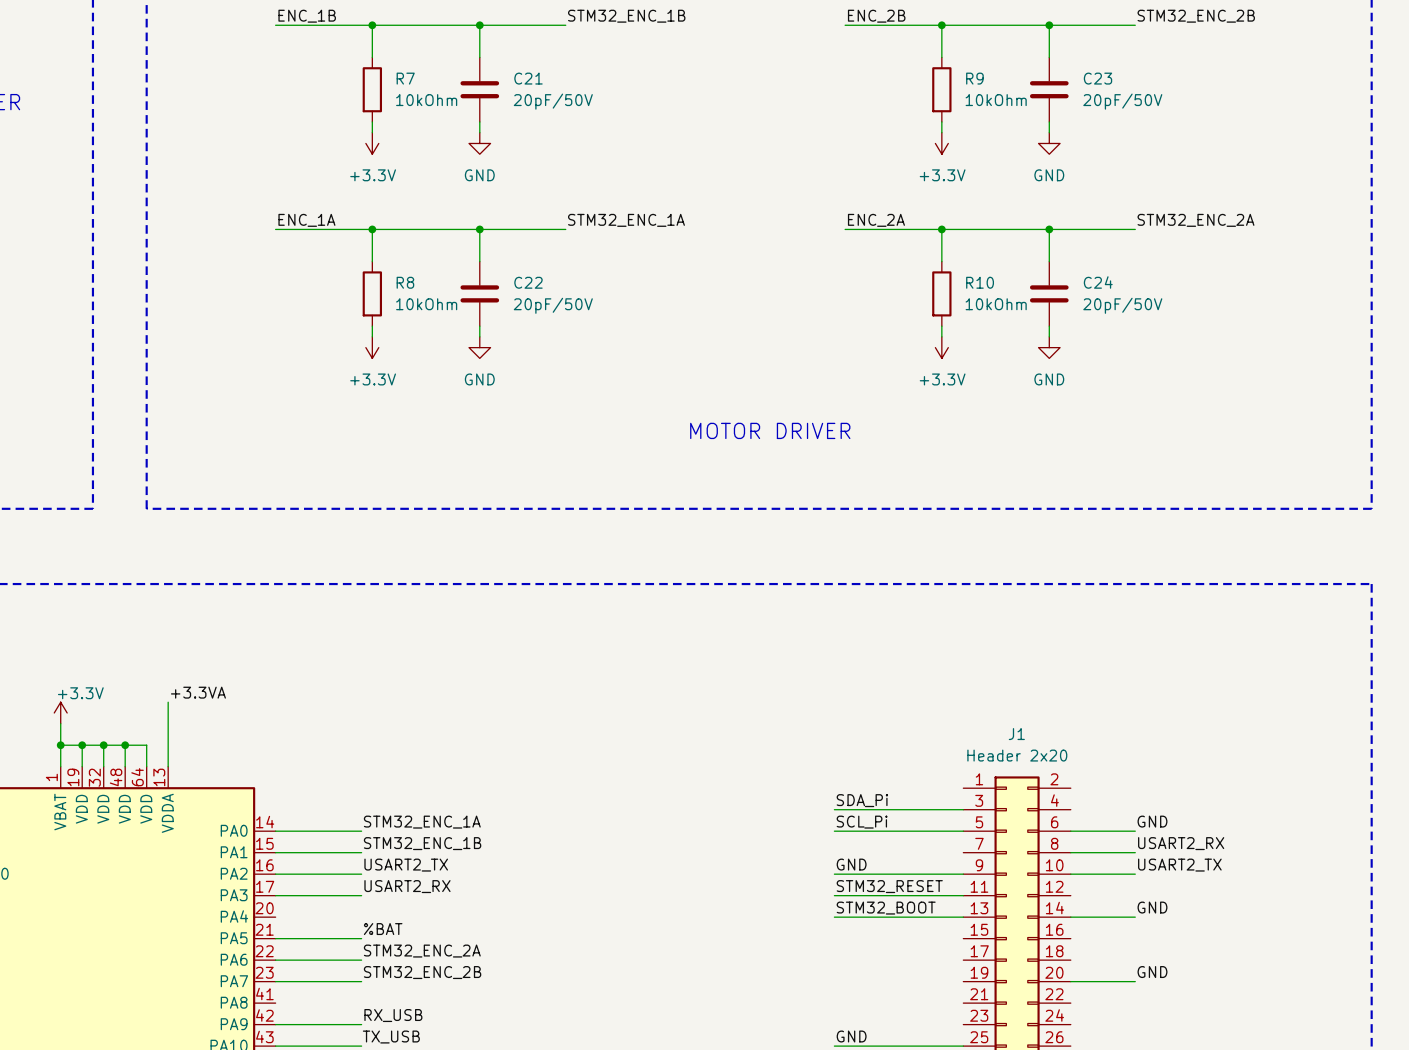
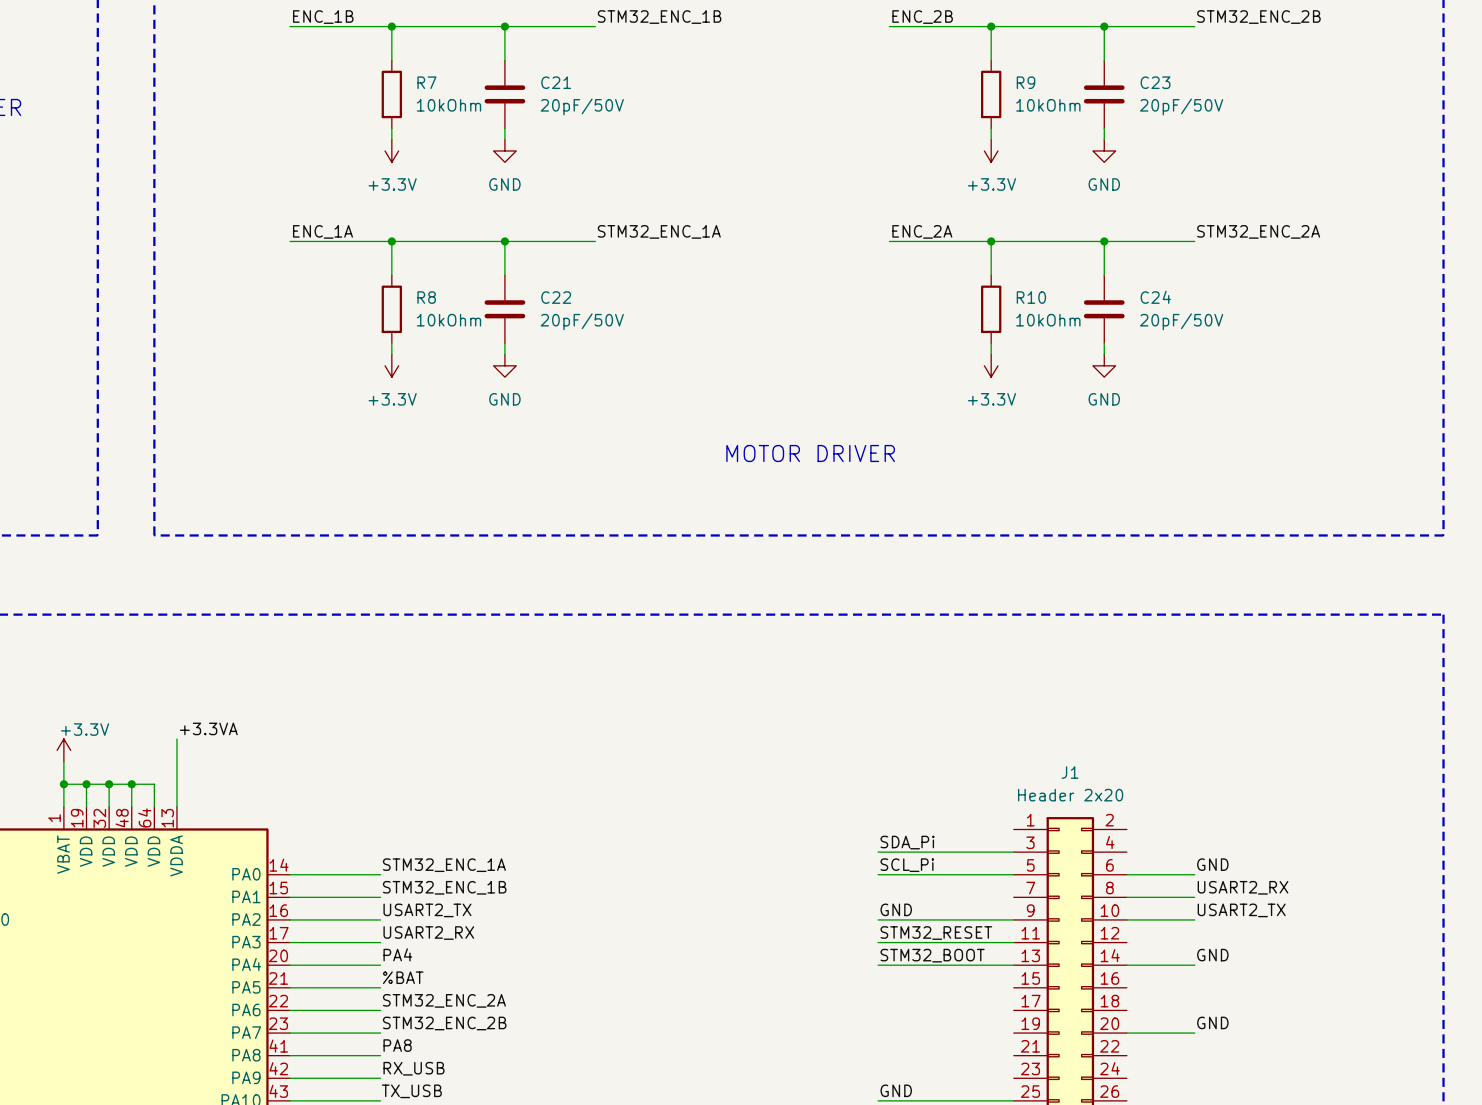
label: none -> PA4 (397, 954)
wire: none -> (290, 965) (380, 965)
label: none -> PA8 (397, 1045)
wire: none -> (290, 1055) (380, 1055)

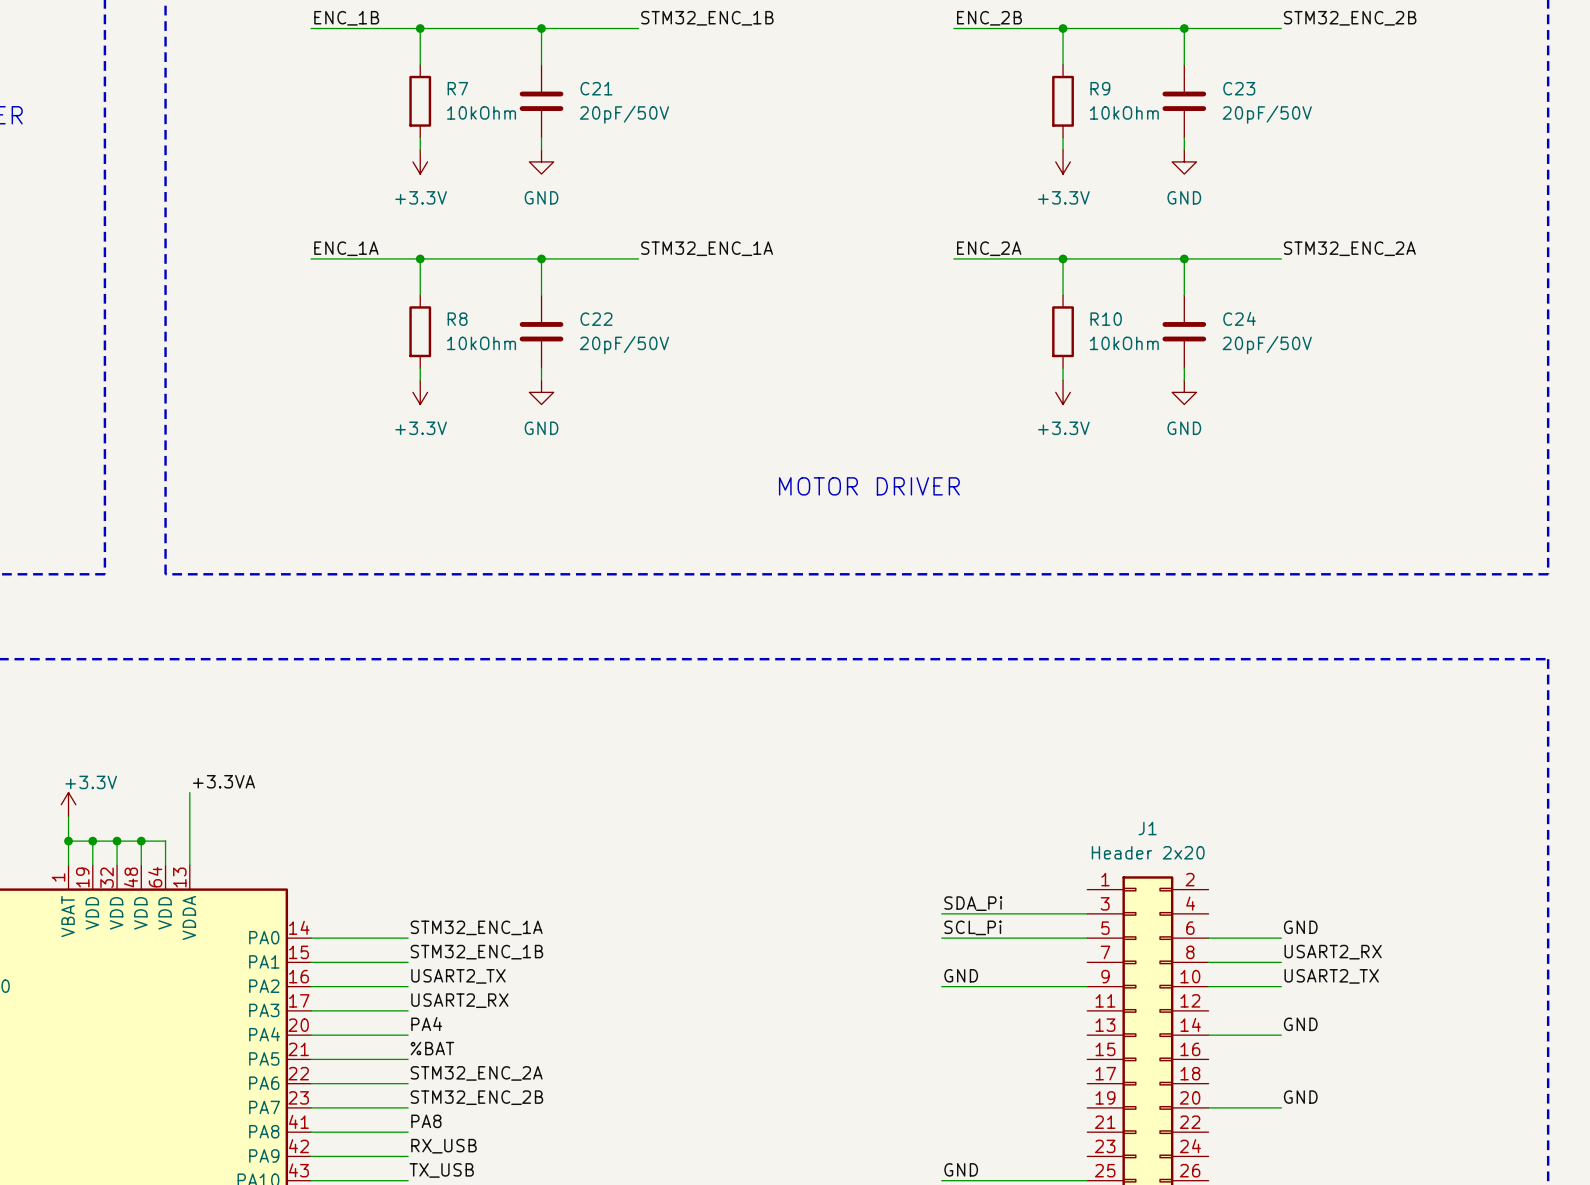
label: STM32_RESET (936, 933) -> none
wire: (878, 942) (1013, 942) -> none
label: STM32_BOOT (932, 955) -> none
wire: (878, 965) (1013, 965) -> none

